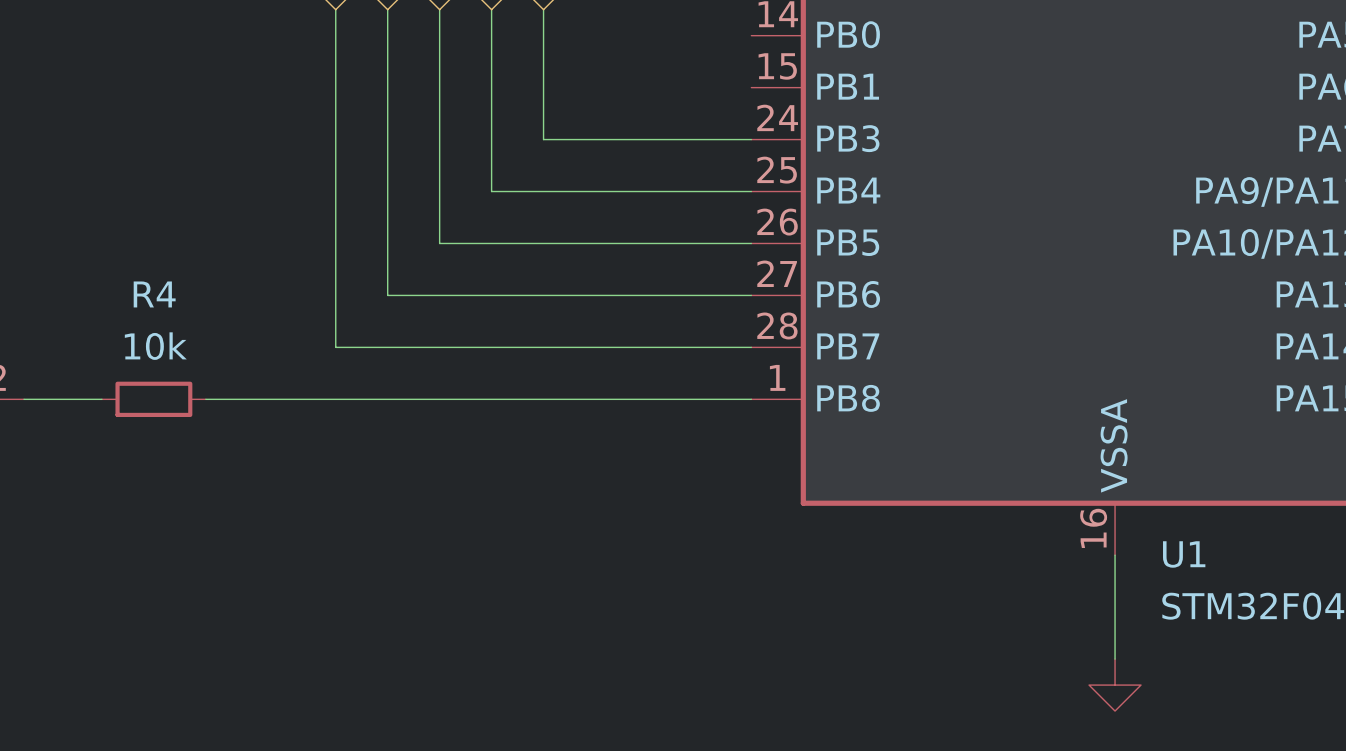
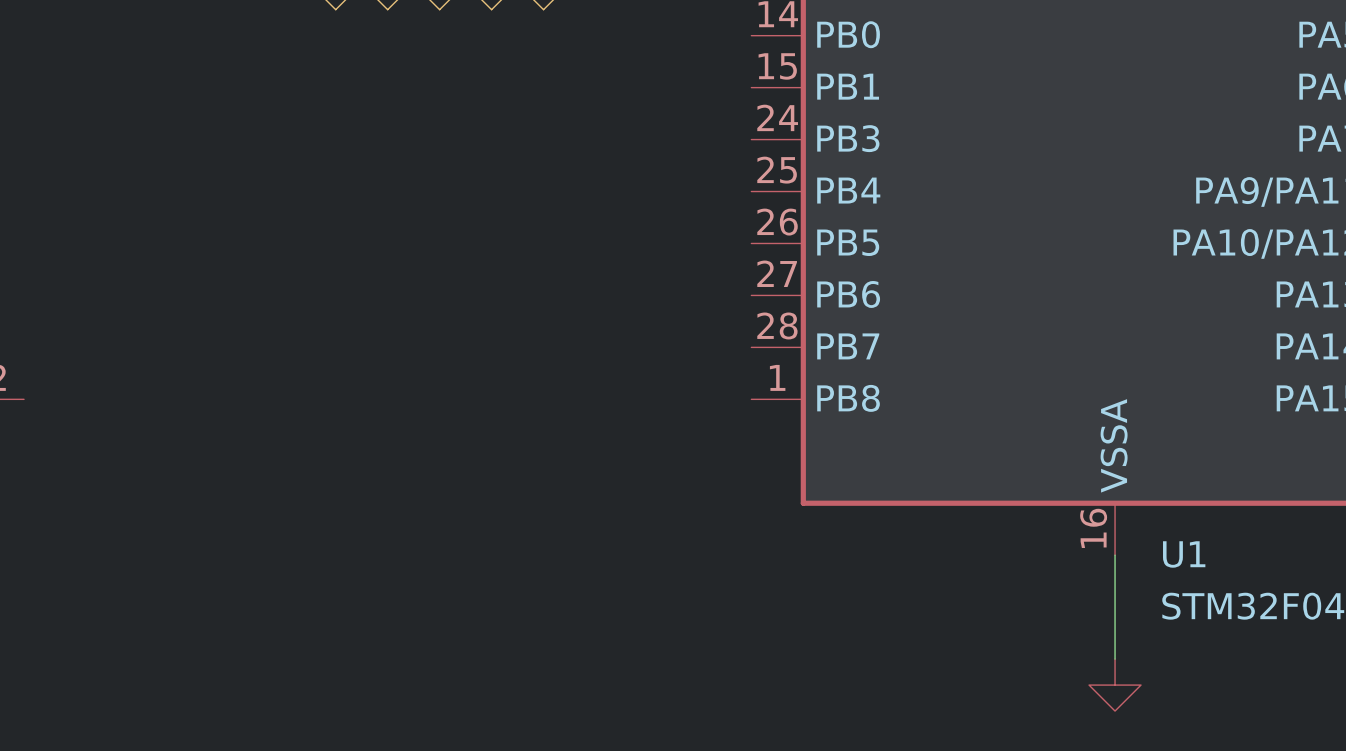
wire: (335, 9) (335, 347) (751, 347) -> none
wire: (387, 9) (387, 295) (751, 295) -> none
wire: (439, 9) (439, 243) (751, 243) -> none
wire: (491, 9) (491, 191) (751, 191) -> none
wire: (543, 9) (543, 139) (751, 139) -> none
wire: (24, 399) (101, 399) -> none
R4: 10k (153, 399) -> none
wire: (205, 399) (751, 399) -> none

